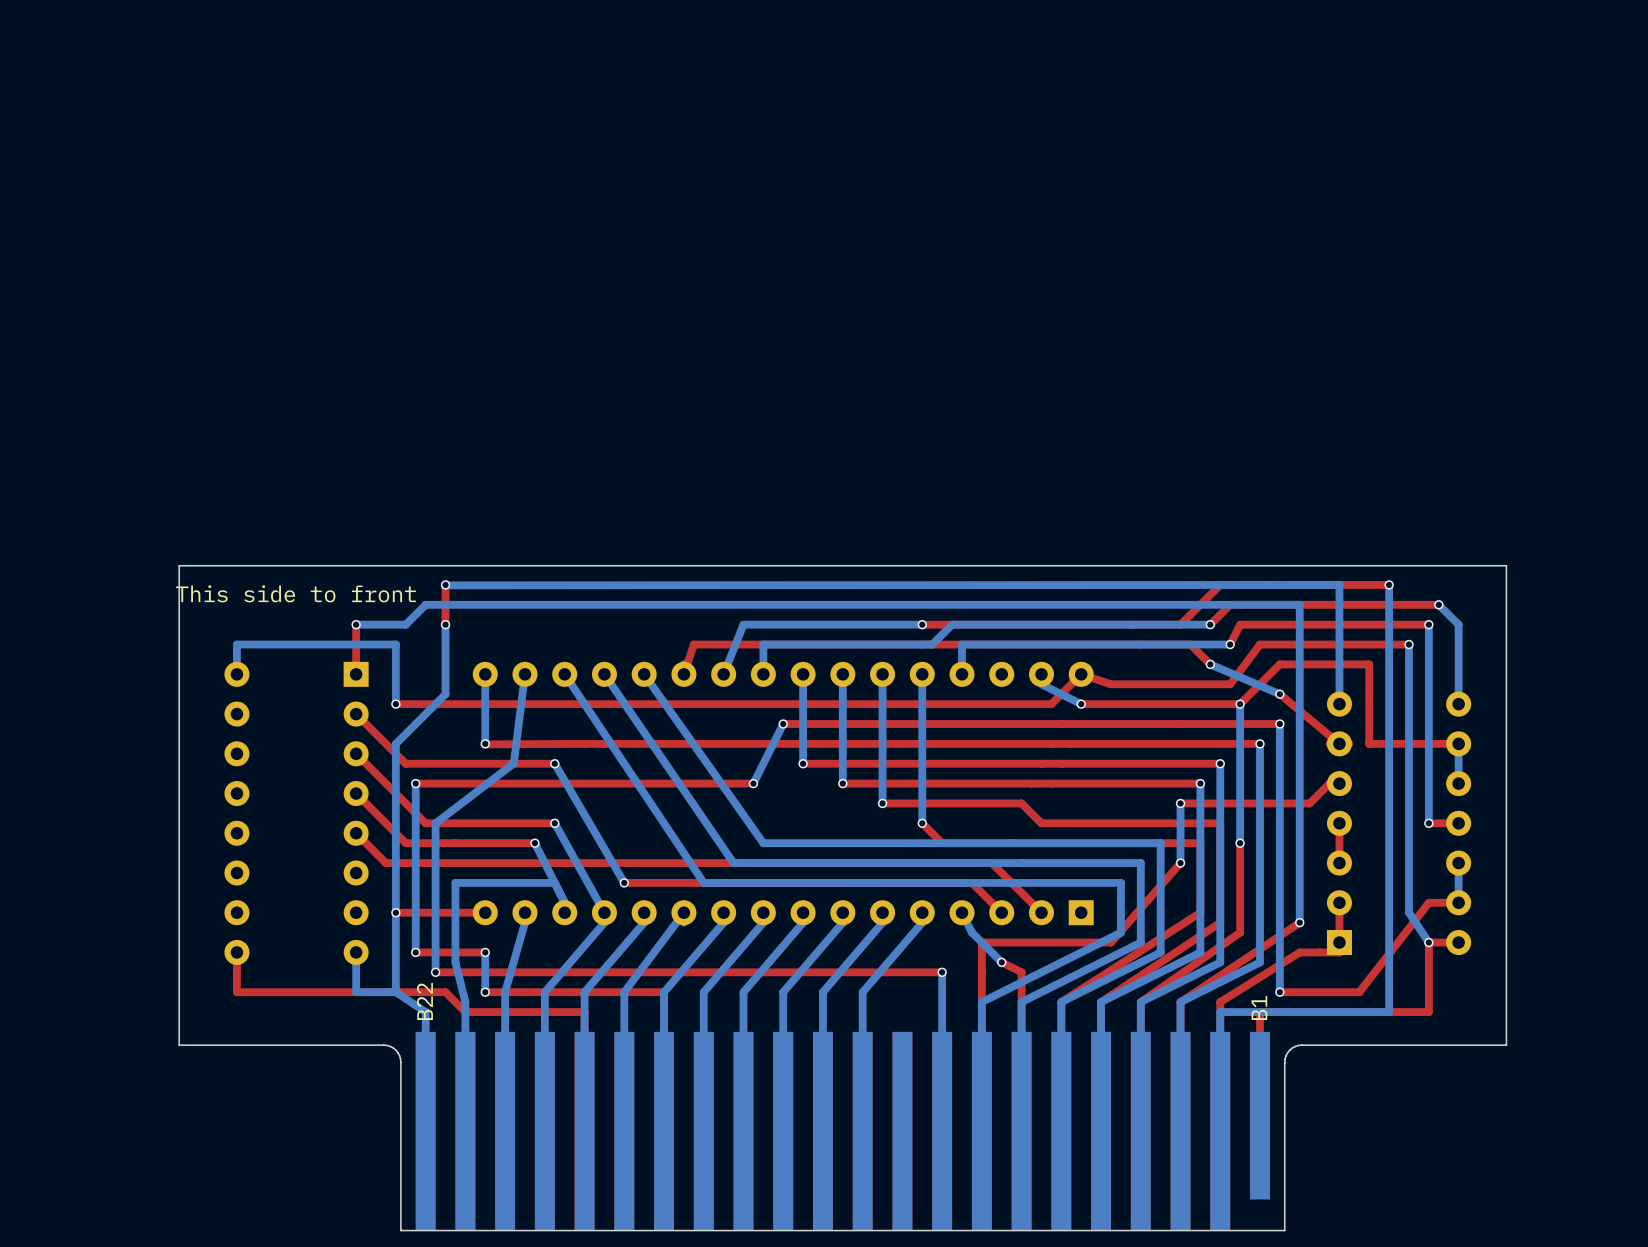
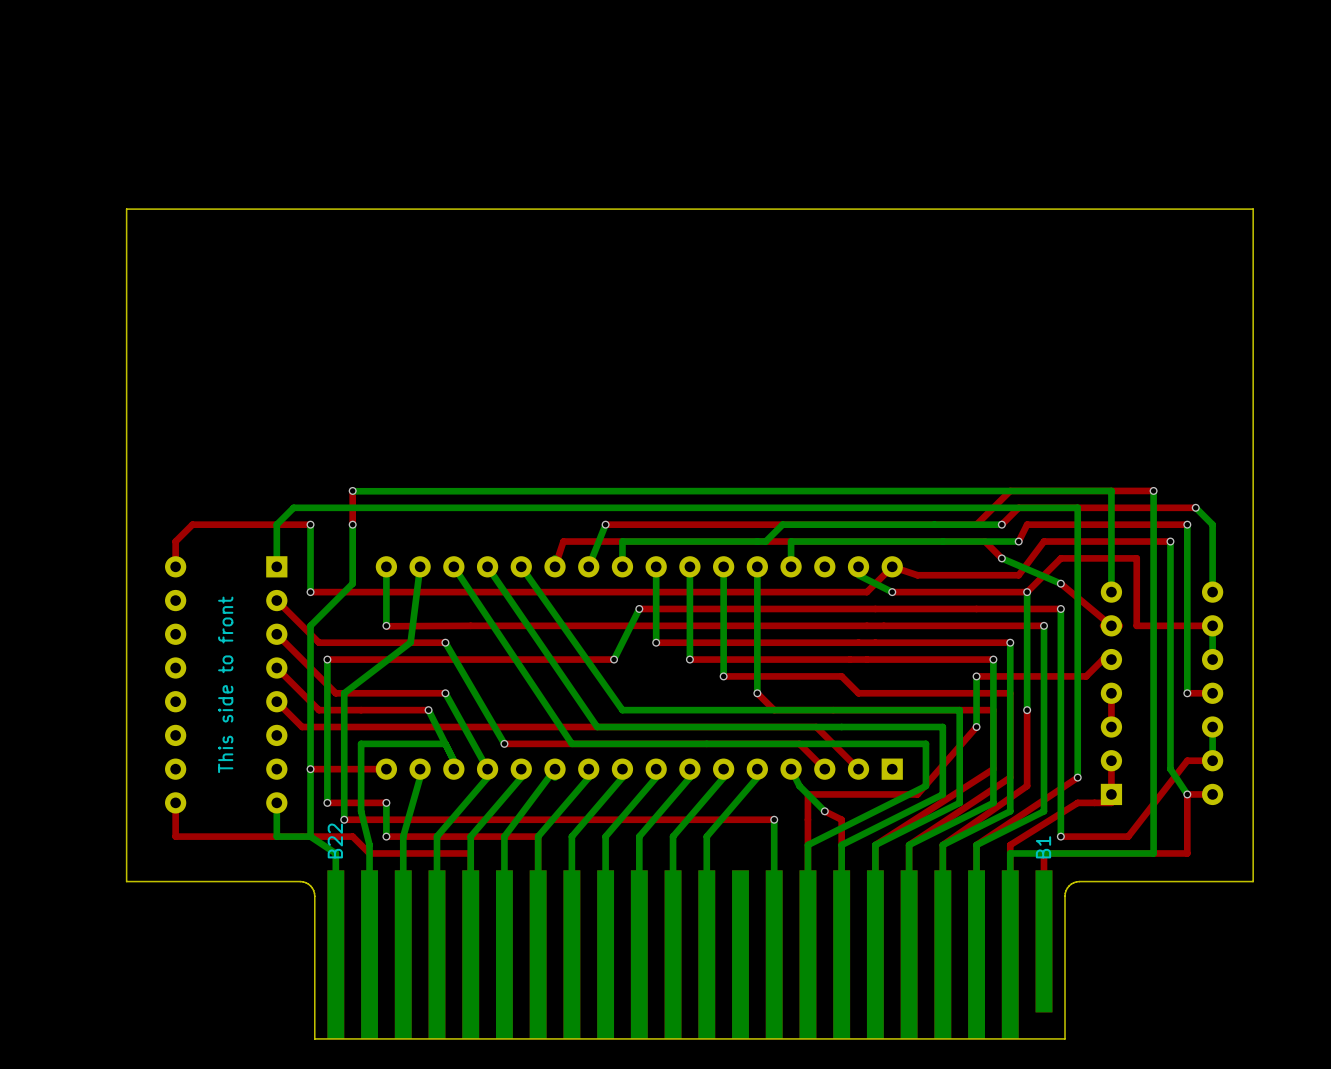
board edge: (179, 565) (1506, 565) (1506, 1045) -> (126, 474) (126, 209) (1253, 209) (1253, 881)
text rotation: 0° (295, 593) -> 90° counterclockwise (225, 684)
bottom track: (425, 604) (405, 624) (356, 624) -> (335, 507) (293, 507) (276, 524) (276, 566)
top track: (356, 624) (356, 674) -> none
via position: (356, 624) -> (310, 524)
top track: none -> (310, 524) (192, 524) (175, 541) (175, 566)
via: none -> (605, 524)
top track: none -> (757, 524) (605, 524)
bottom track: (922, 624) (743, 624) -> none
via: (922, 624) -> none
bottom track: (395, 644) (236, 644) (236, 674) -> (310, 541) (310, 524)

